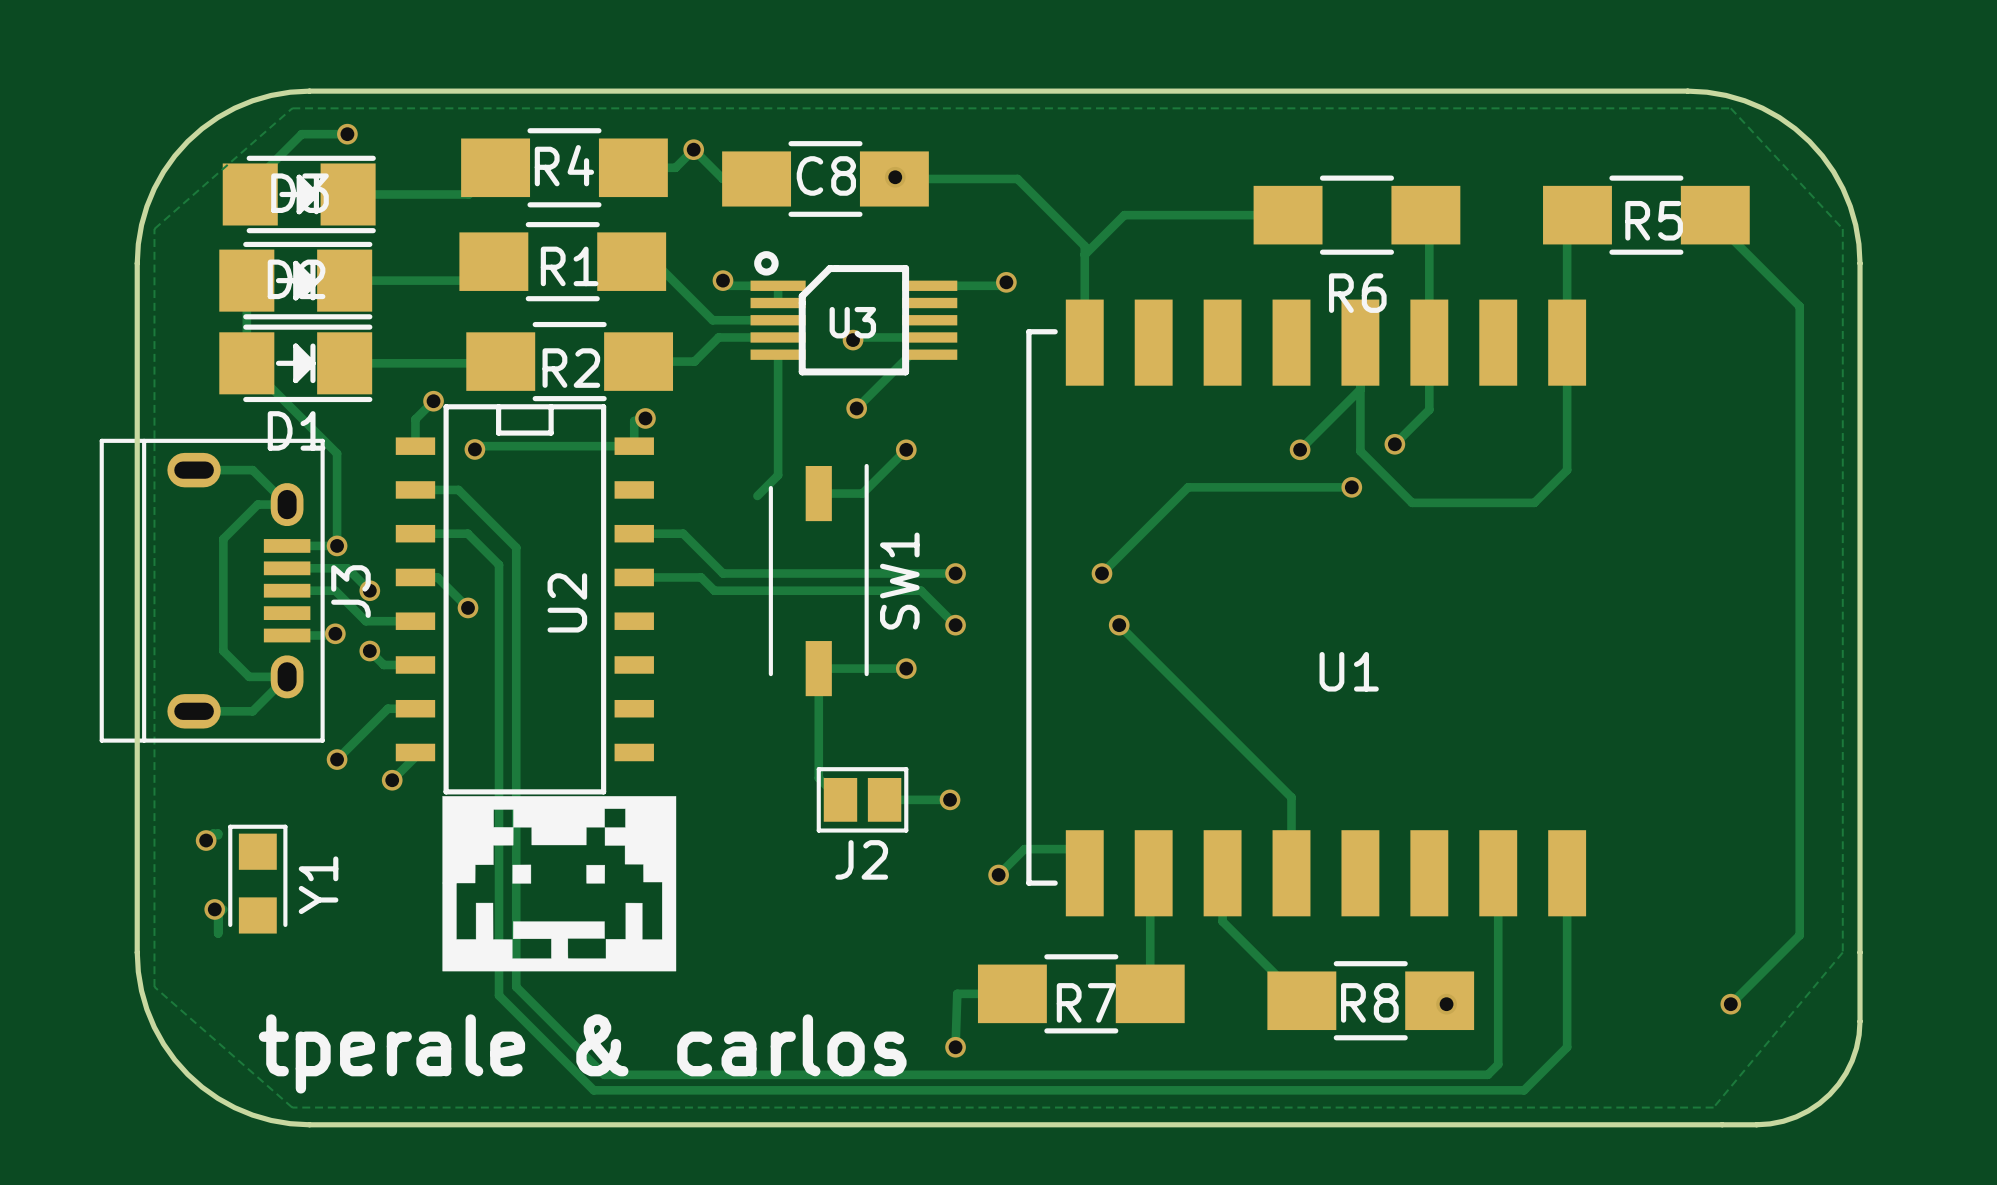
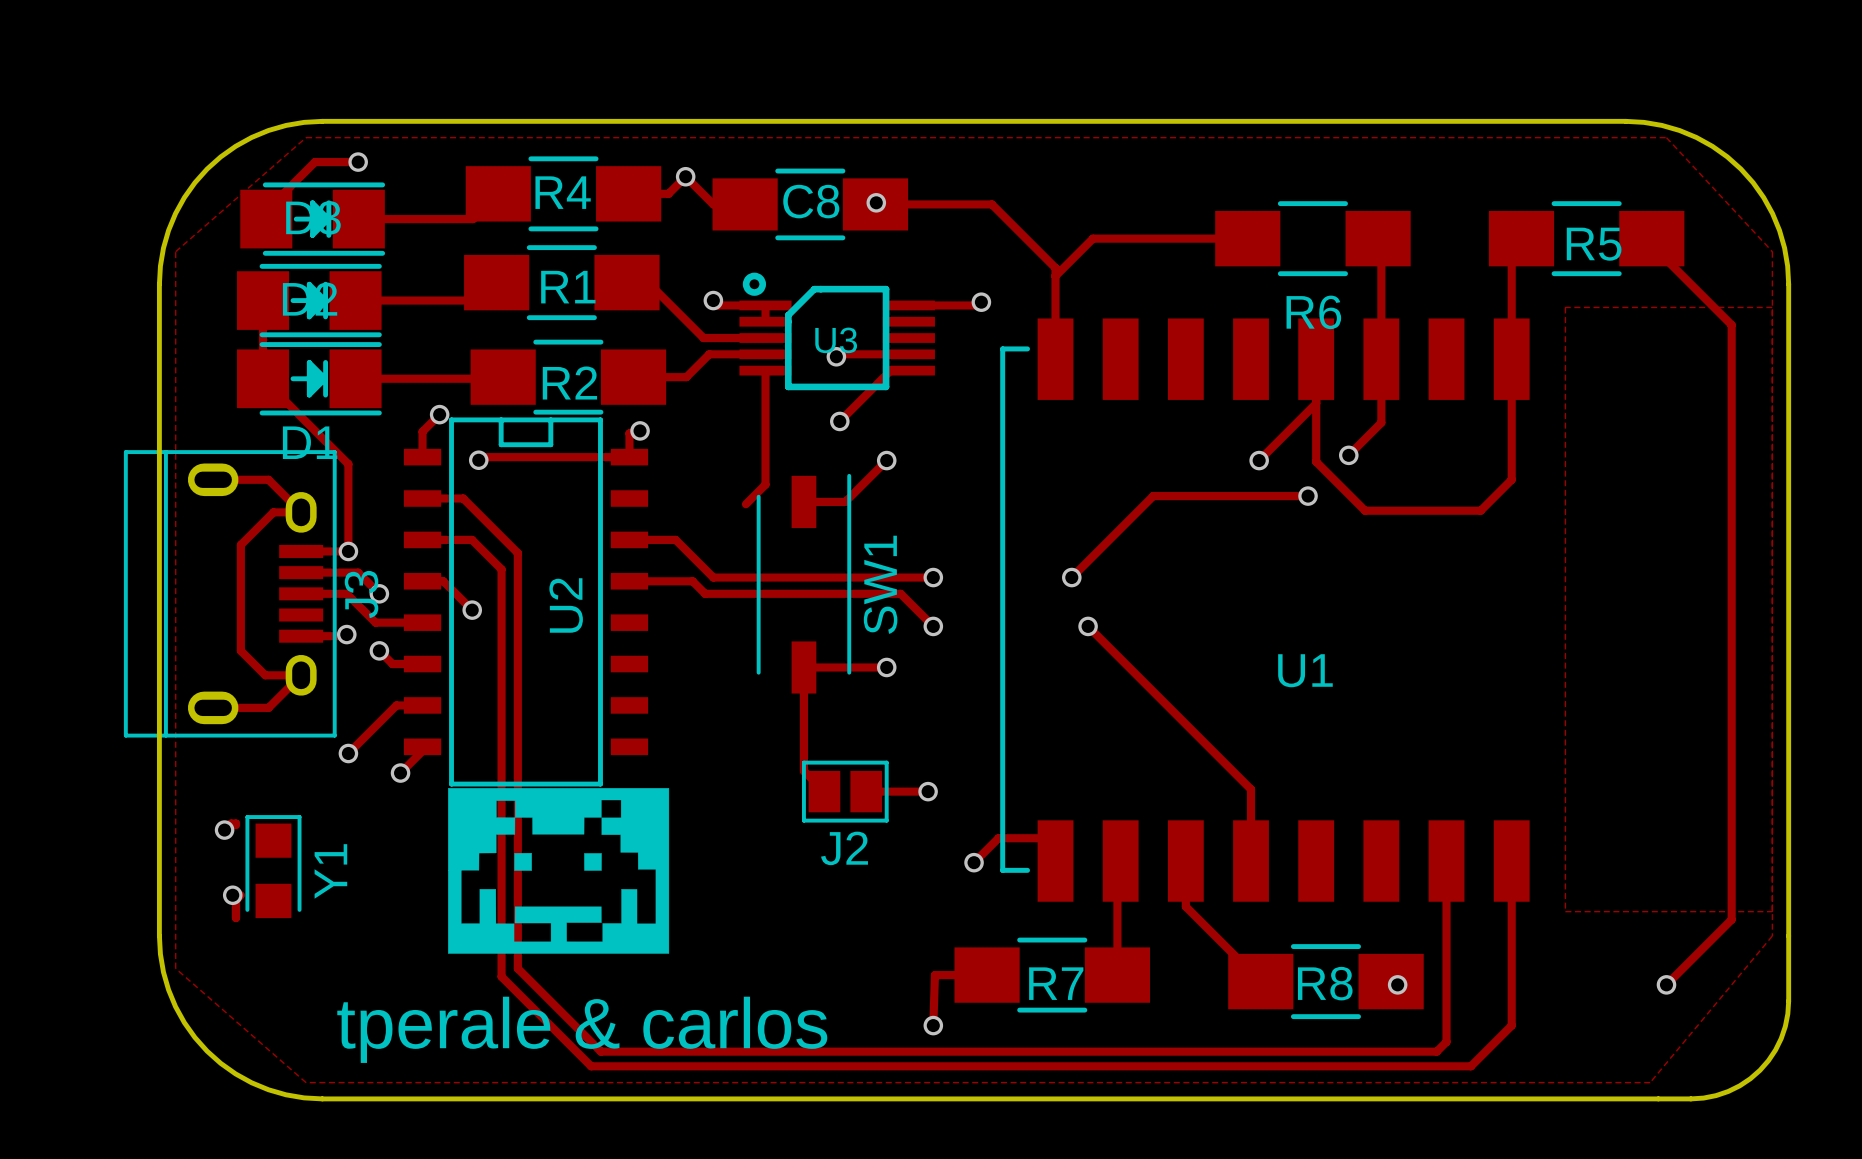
zone outline: none -> (1565, 307) (1772, 307) (1772, 911) (1565, 911) (1565, 307)

